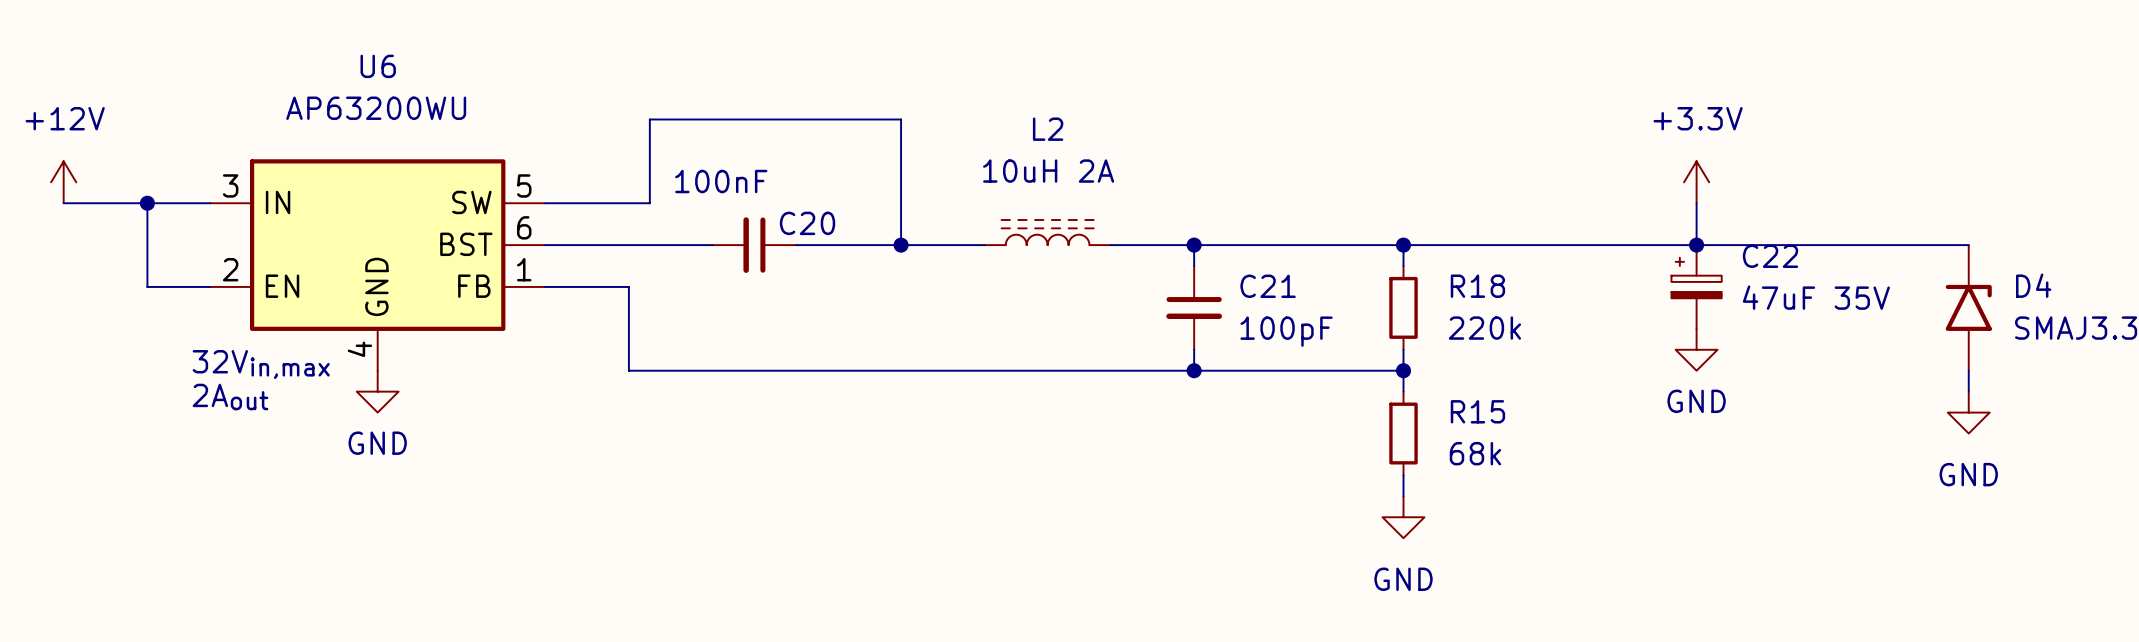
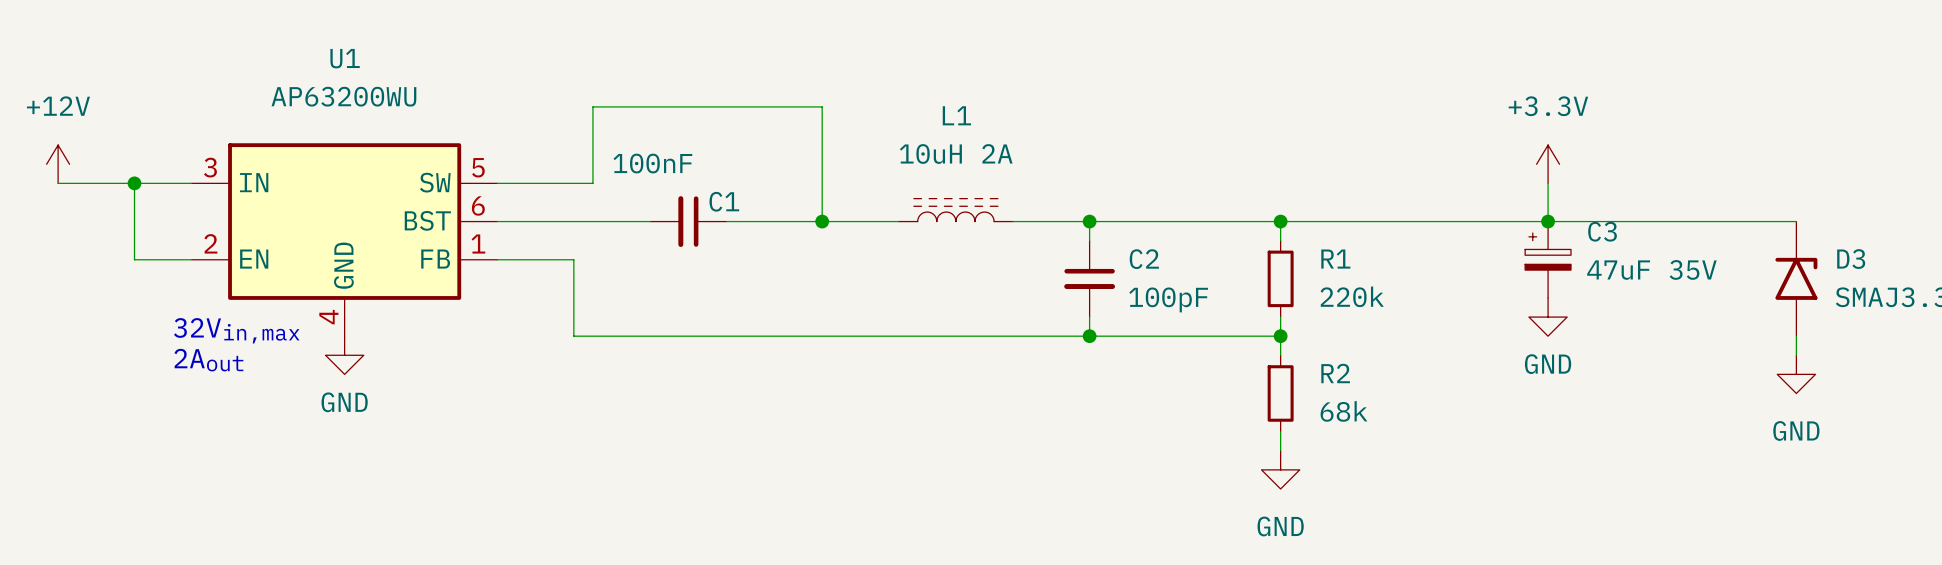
U6 name: U6 (378, 66) -> U1 (345, 58)
L2 name: L2 (1048, 129) -> L1 (956, 115)
C20 name: C20 (807, 223) -> C1 (724, 201)
C22 name: C22 (1770, 256) -> C3 (1602, 231)
D4 name: D4 (2033, 285) -> D3 (1851, 259)
C21 name: C21 (1268, 286) -> C2 (1144, 259)
R18 name: R18 (1477, 286) -> R1 (1335, 259)
R15 name: R15 (1477, 411) -> R2 (1335, 373)

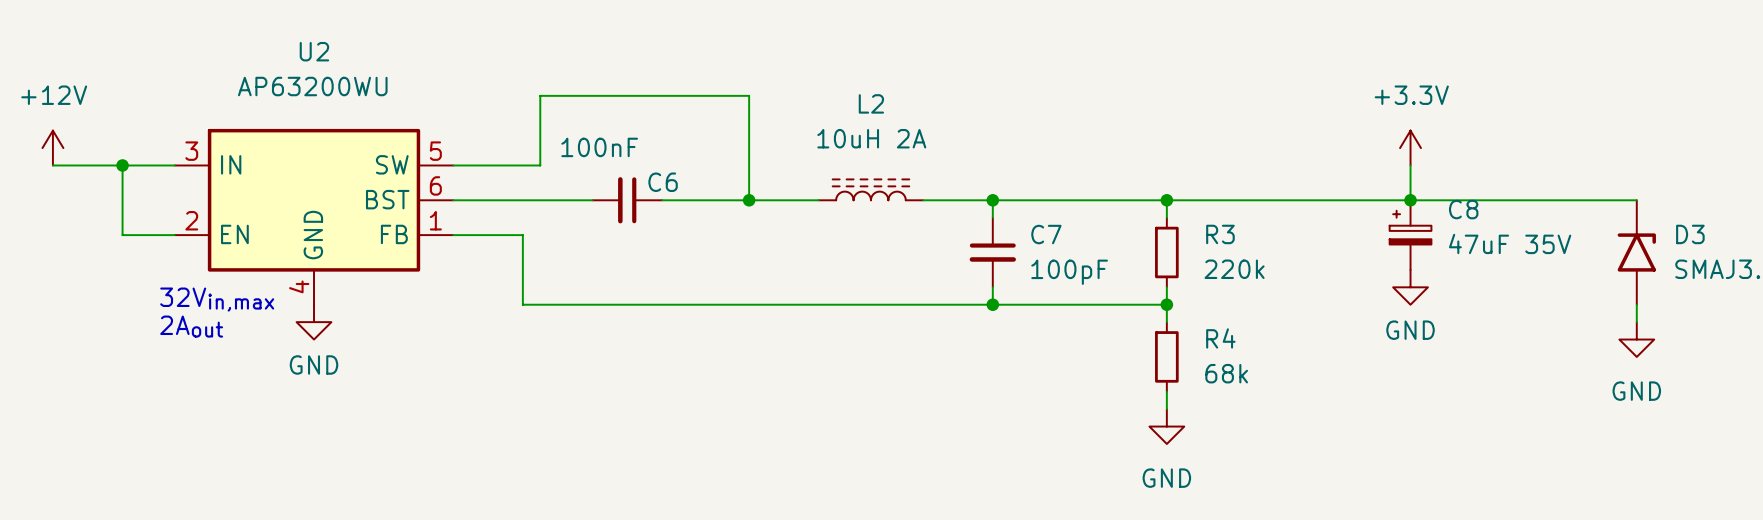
U1 name: U1 (345, 58) -> U2 (314, 51)
L1 name: L1 (956, 115) -> L2 (871, 103)
C1 name: C1 (724, 201) -> C6 (663, 182)
C3 name: C3 (1602, 231) -> C8 (1463, 209)
C2 name: C2 (1144, 259) -> C7 (1046, 234)
R1 name: R1 (1335, 259) -> R3 (1220, 234)
R2 name: R2 (1335, 373) -> R4 (1220, 338)

